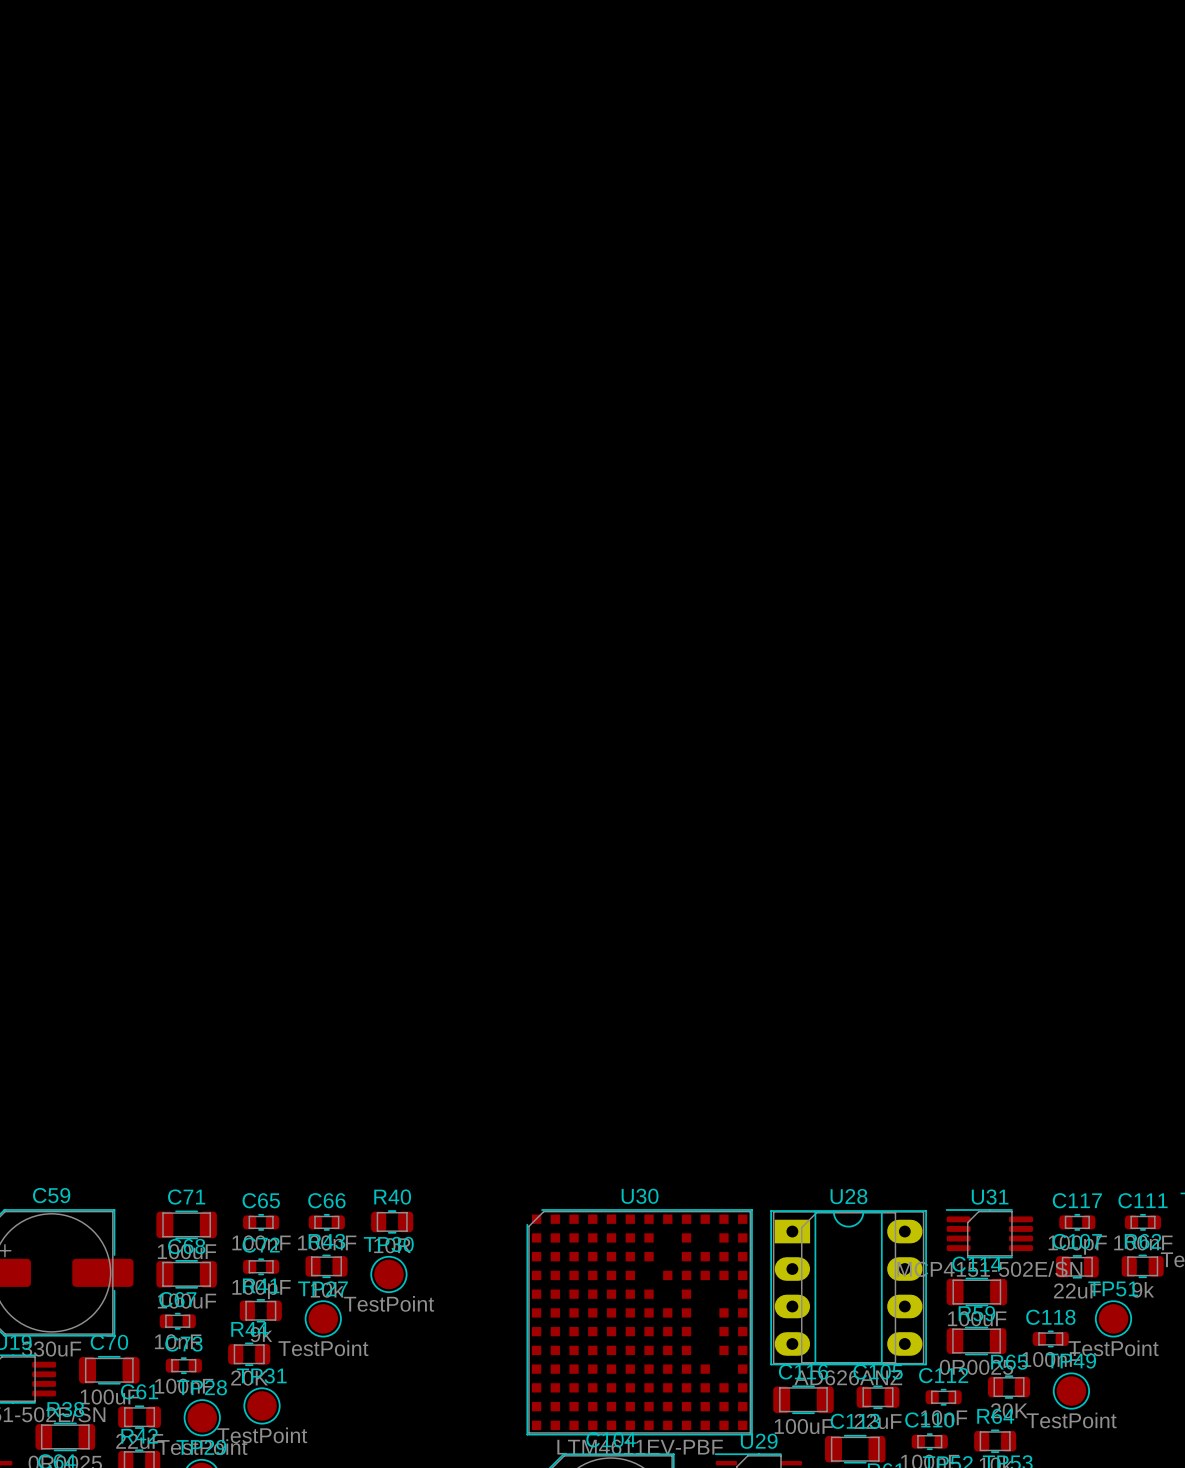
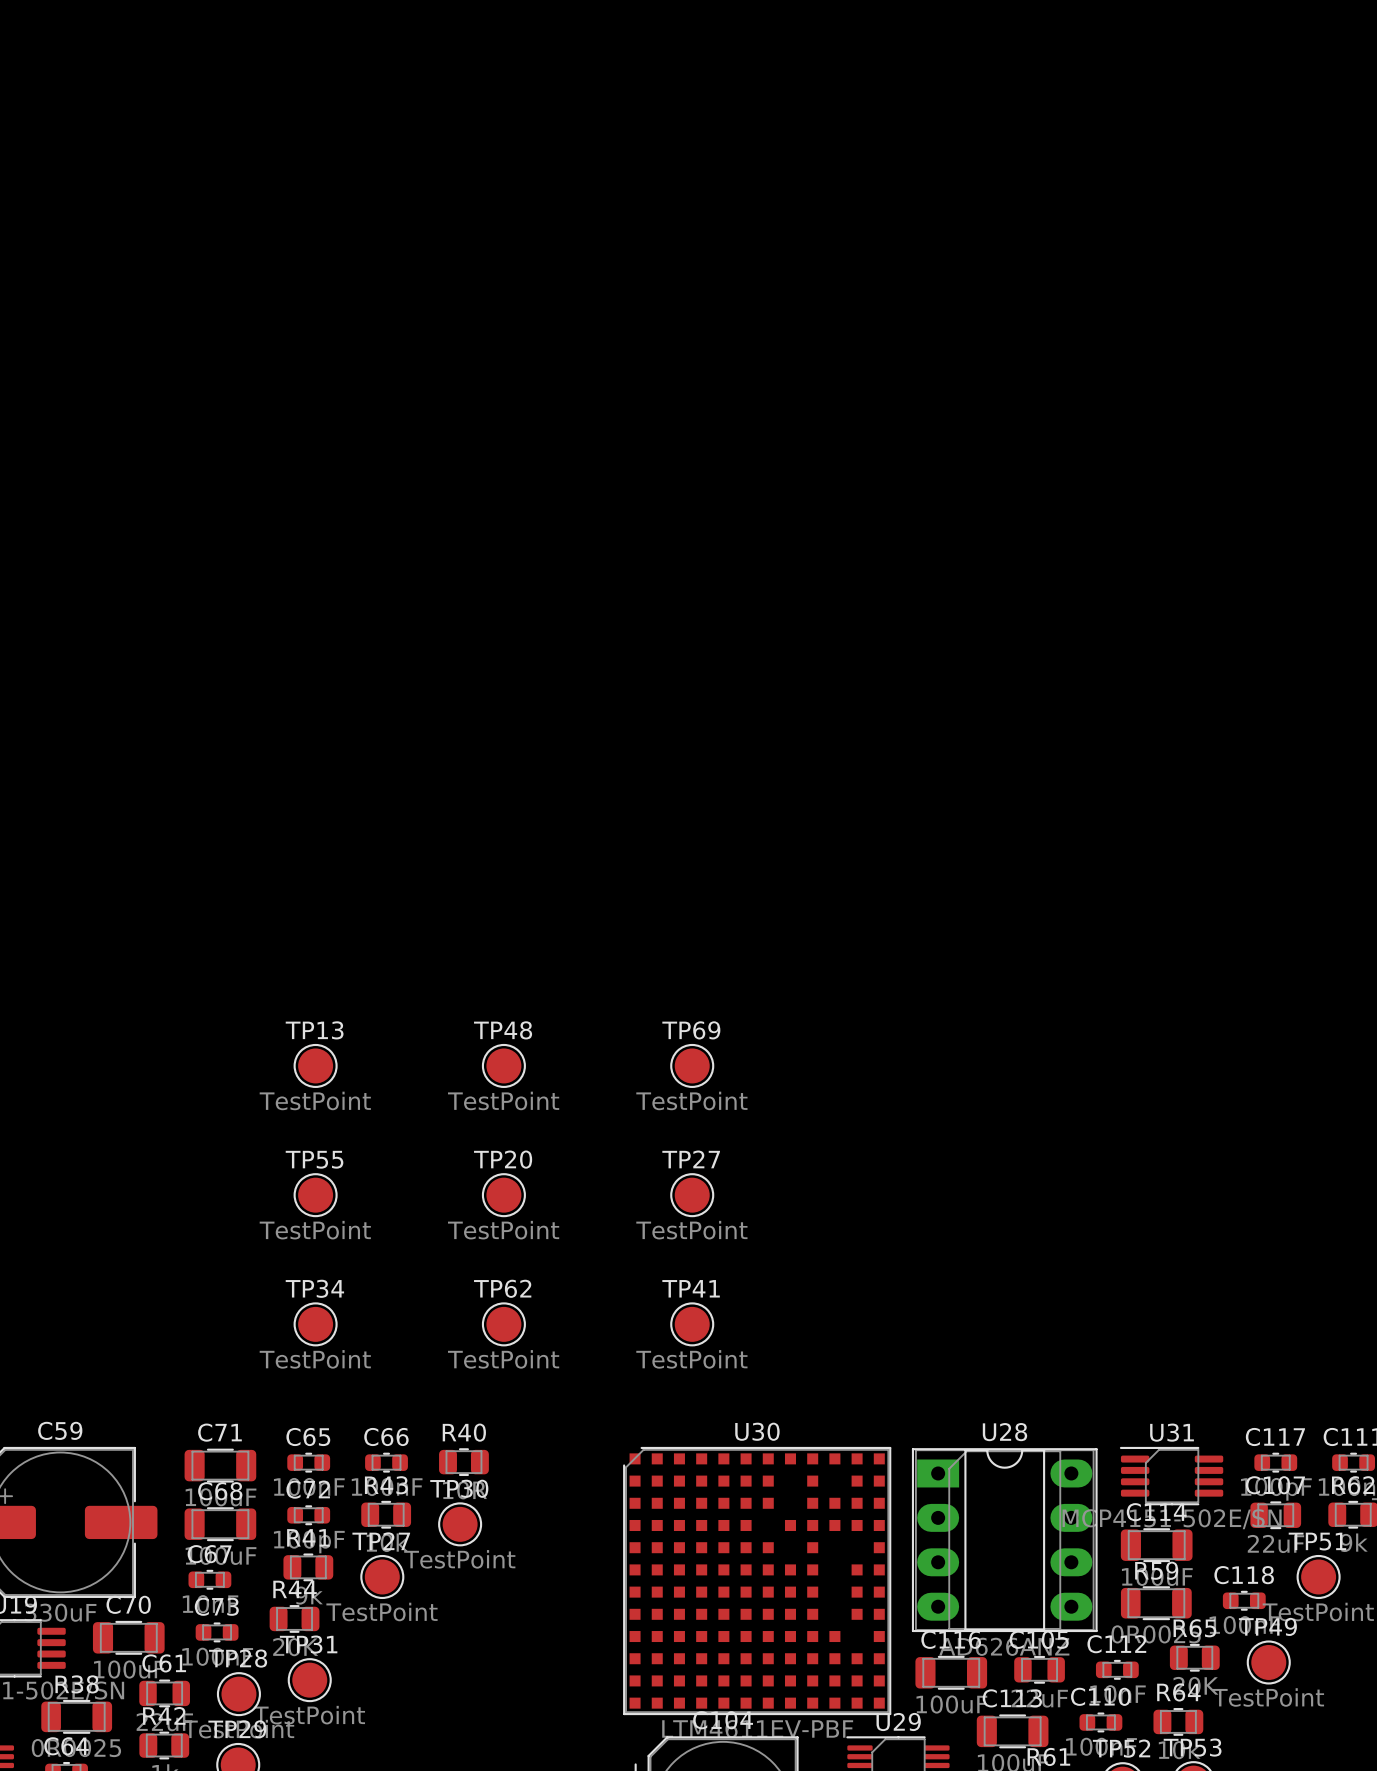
TP13: none -> TestPoint (315, 1065)
TP48: none -> TestPoint (503, 1065)
TP69: none -> TestPoint (692, 1065)
TP55: none -> TestPoint (315, 1195)
TP20: none -> TestPoint (503, 1195)
TP27: none -> TestPoint (692, 1195)
TP34: none -> TestPoint (315, 1324)
TP62: none -> TestPoint (503, 1324)
TP41: none -> TestPoint (692, 1324)

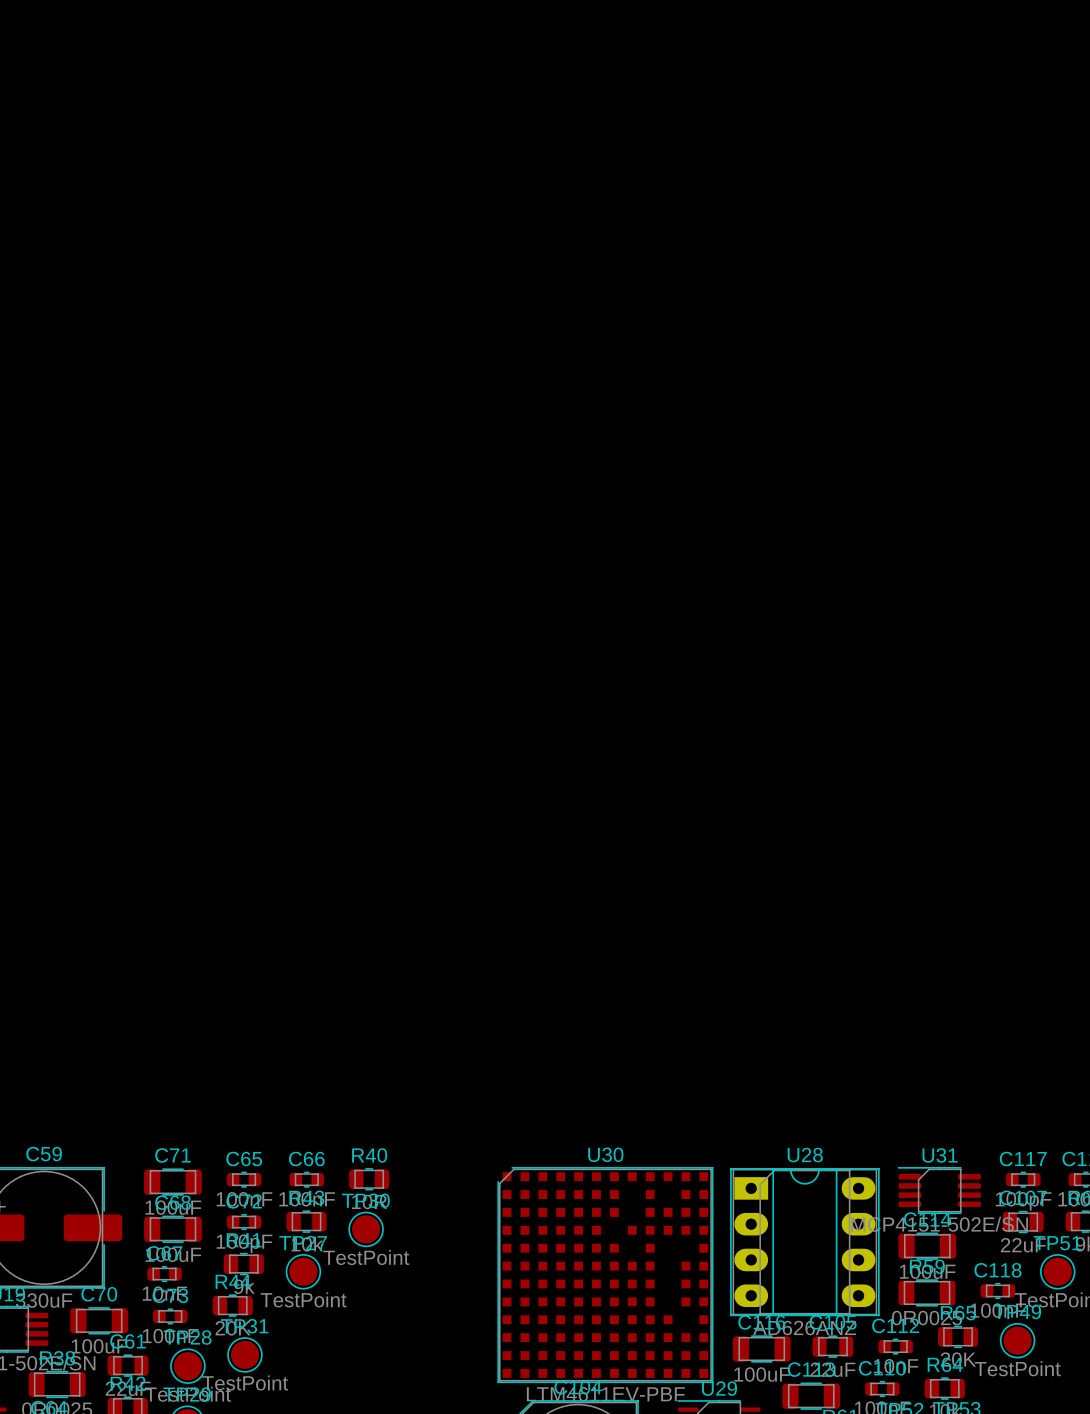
TP13: TestPoint (315, 1065) -> none
TP48: TestPoint (503, 1065) -> none
TP69: TestPoint (692, 1065) -> none
TP55: TestPoint (315, 1195) -> none
TP20: TestPoint (503, 1195) -> none
TP27: TestPoint (692, 1195) -> none
TP34: TestPoint (315, 1324) -> none
TP62: TestPoint (503, 1324) -> none
TP41: TestPoint (692, 1324) -> none

